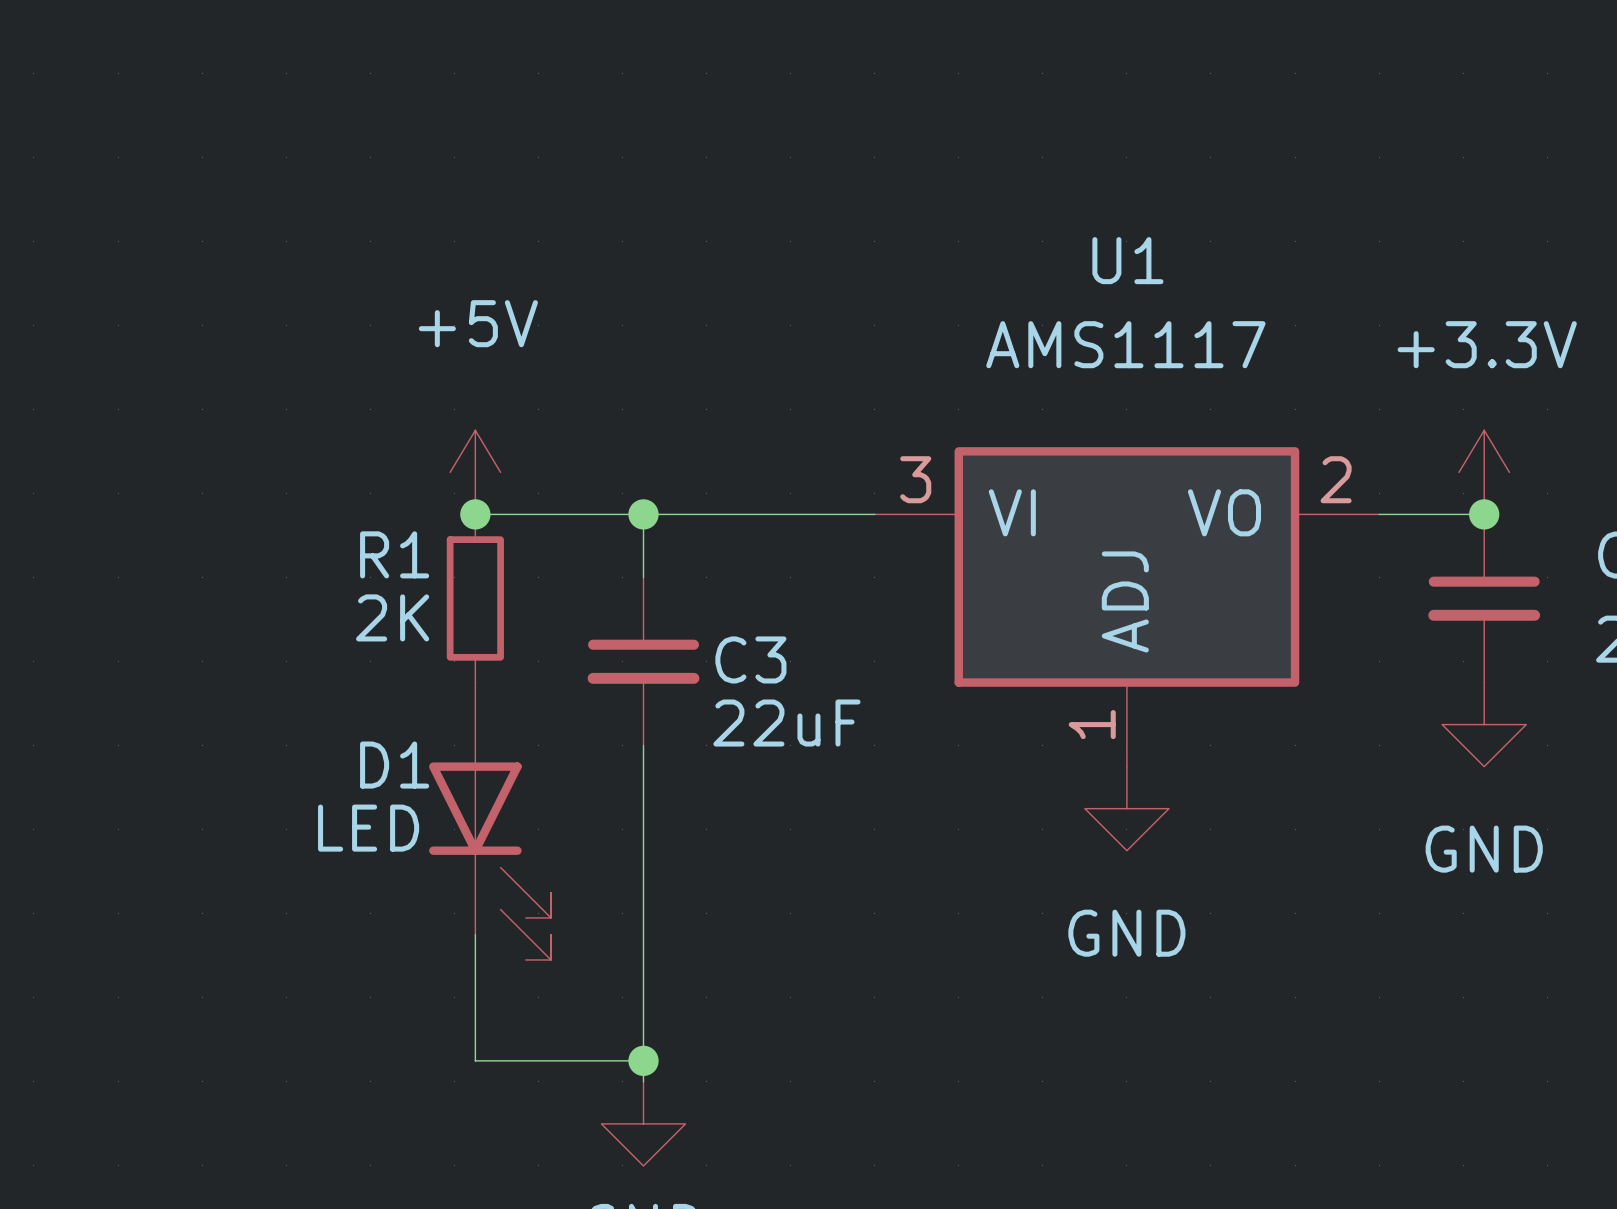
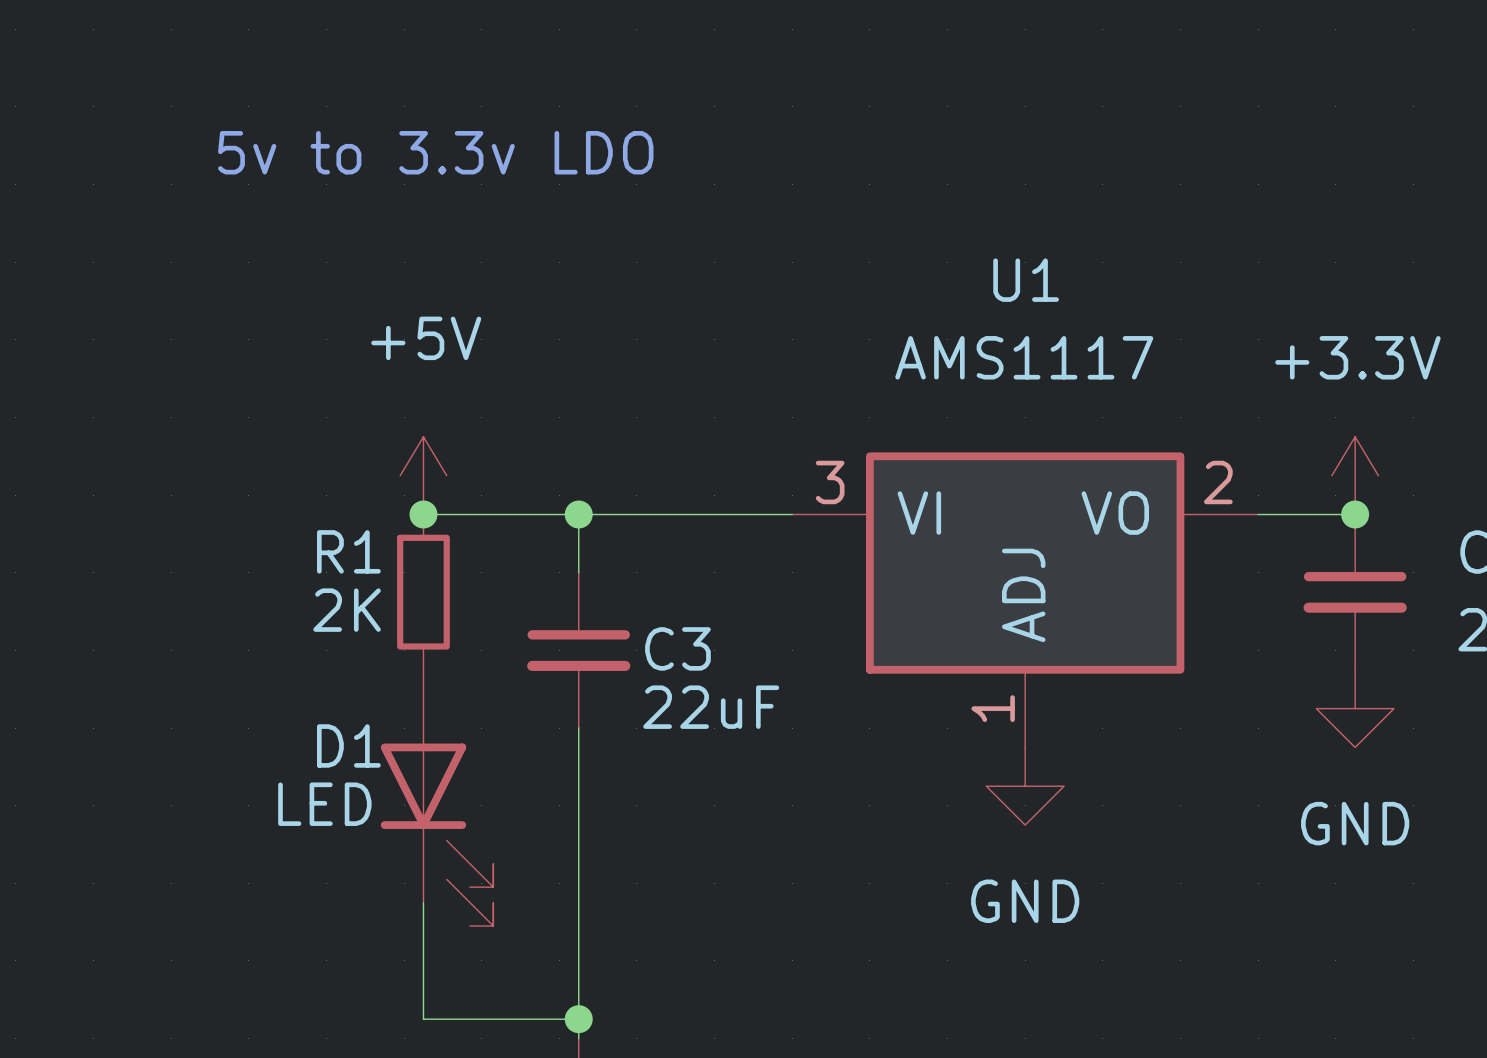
text: none -> 5v to 3.3v LDO (435, 152)

